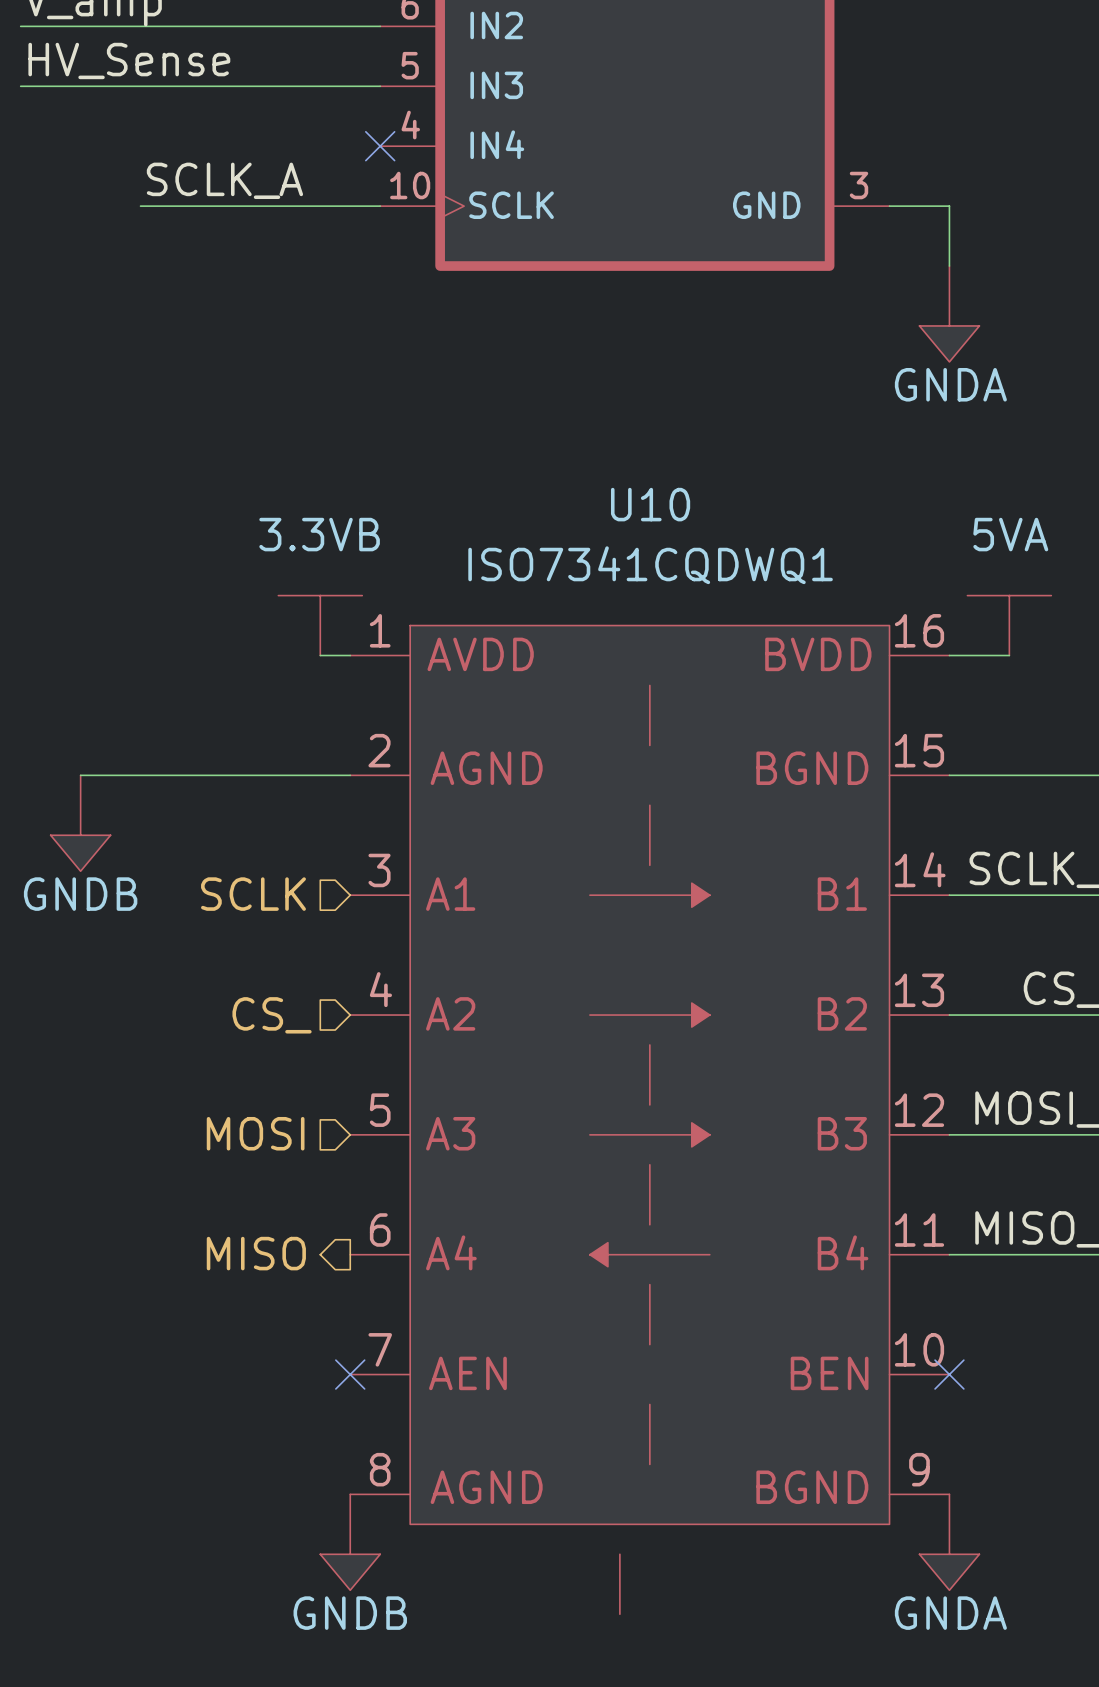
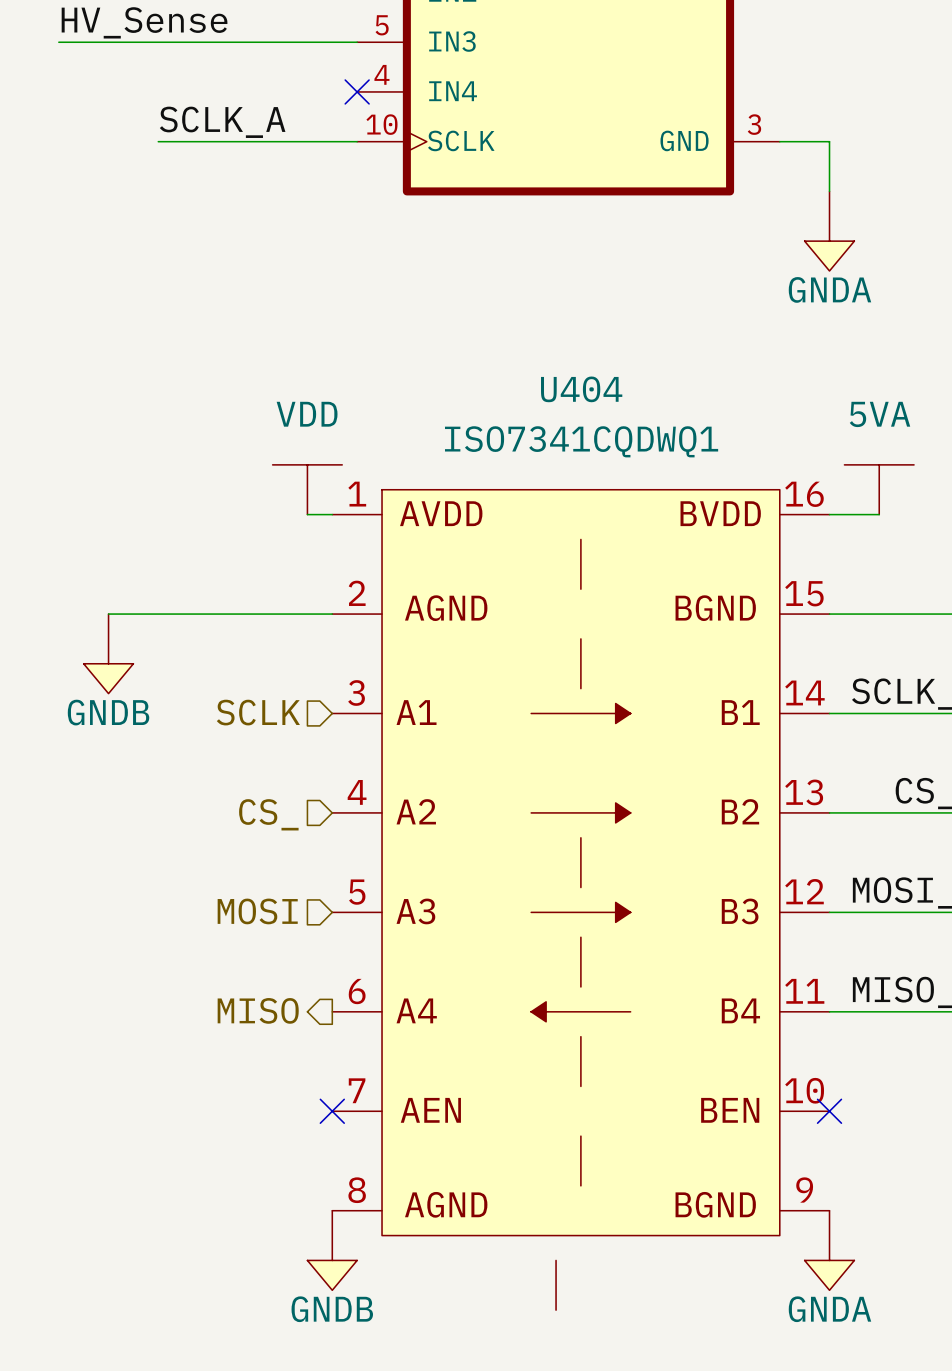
U10 name: U10 (650, 504) -> U404 (581, 389)
power symbol: 3.3VB (320, 625) -> VDD (307, 489)

